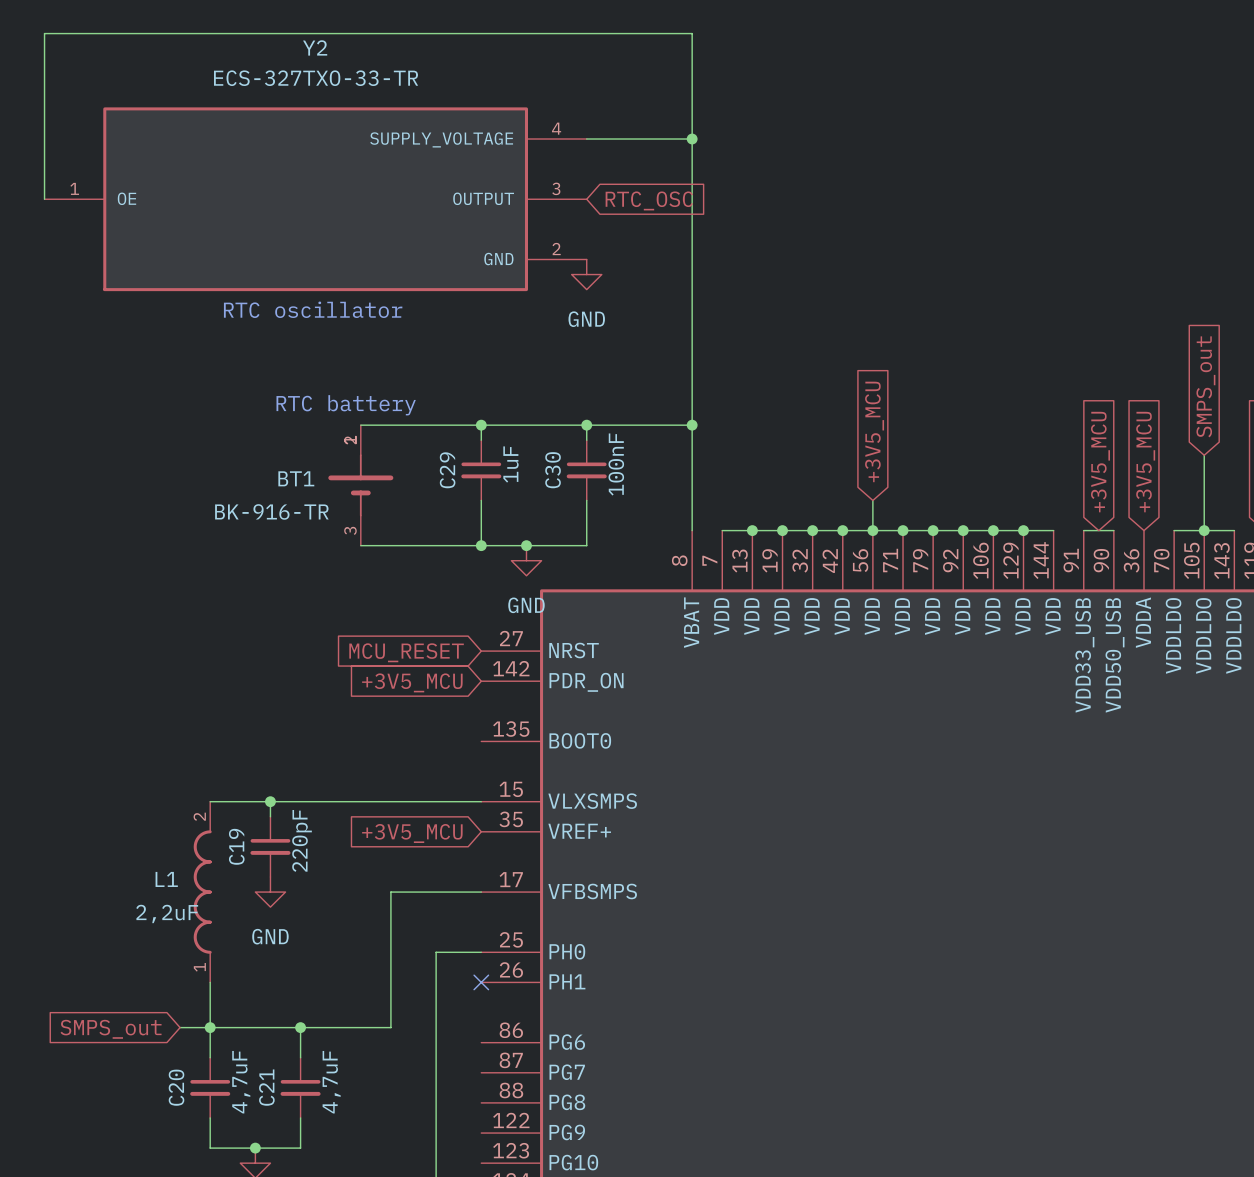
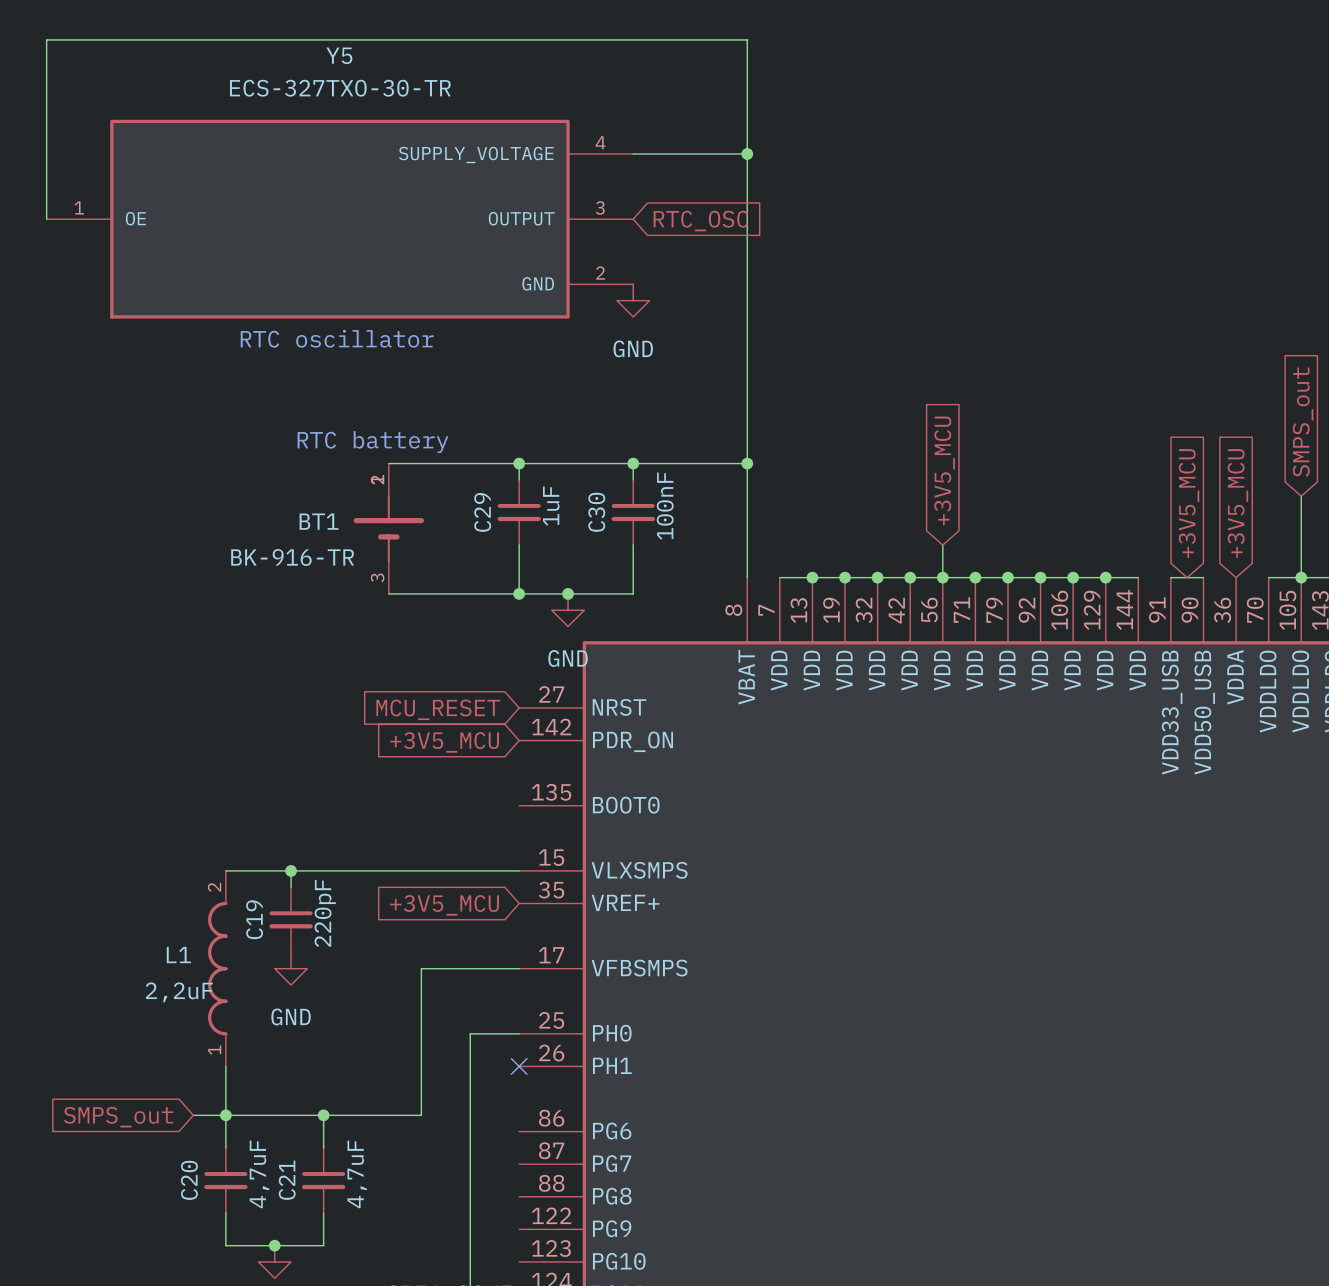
Y2 name: Y2 (315, 47) -> Y5 (339, 55)
Y2 value: ECS-327TXO-33-TR (316, 78) -> ECS-327TXO-30-TR (340, 88)

